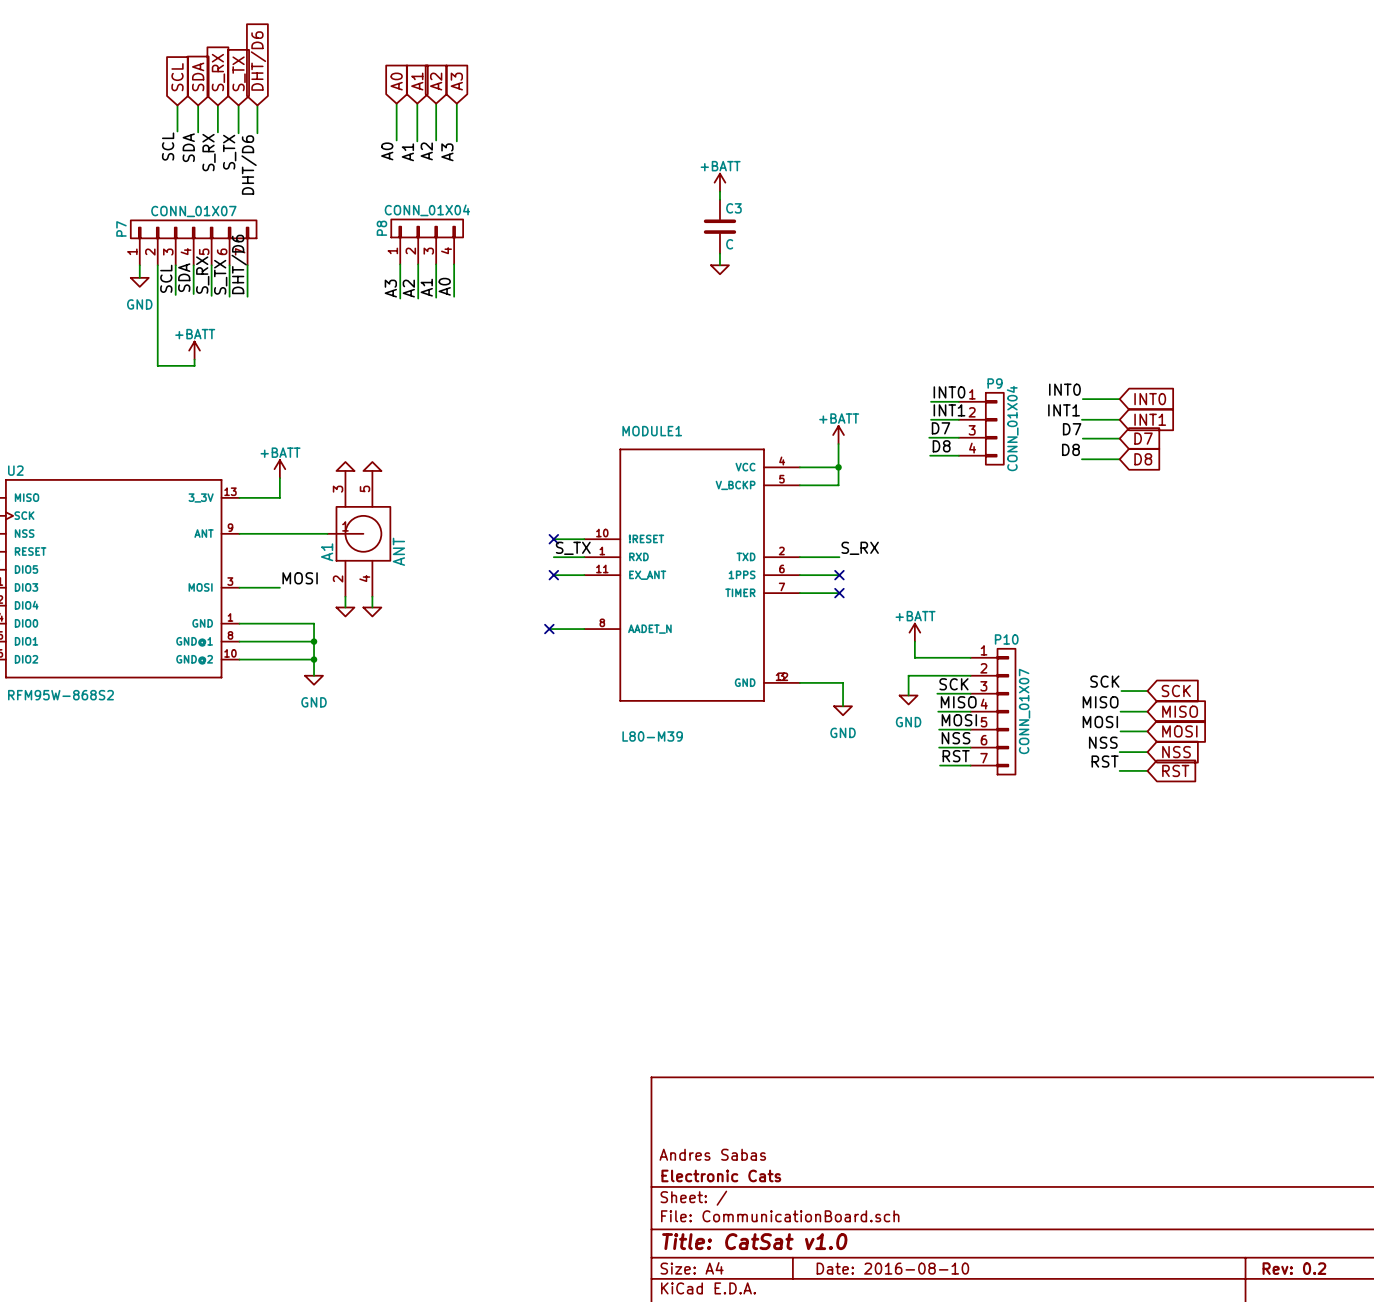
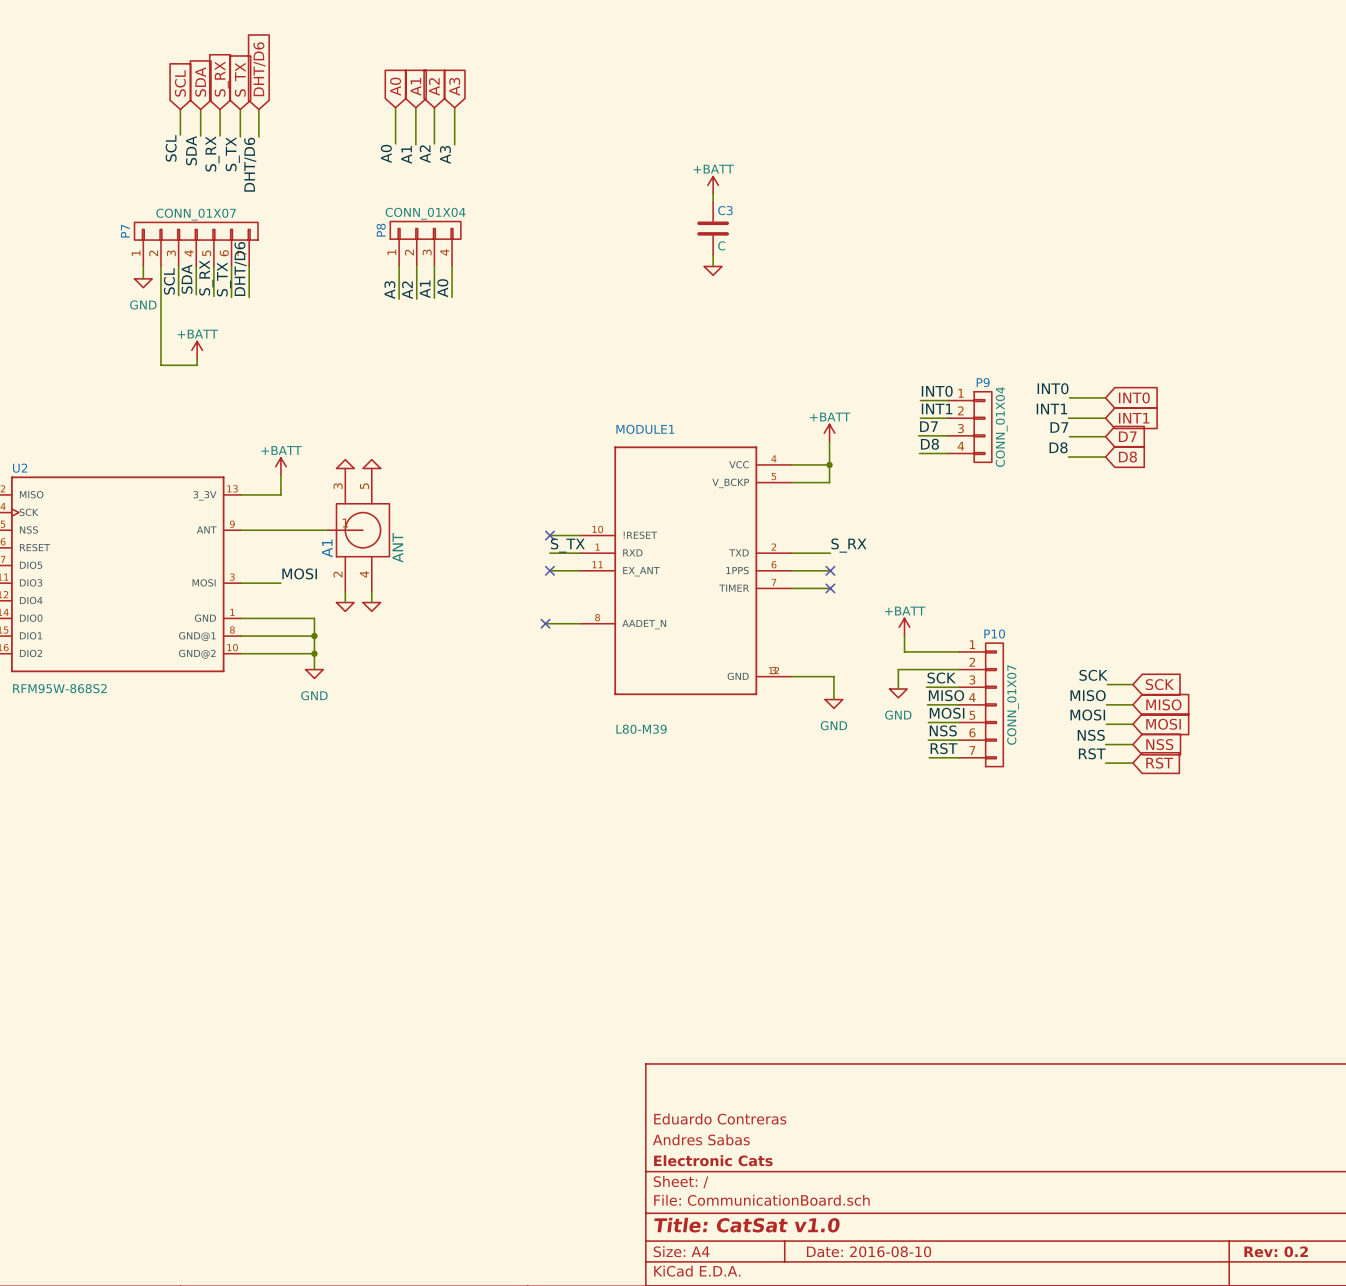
title block: none -> Eduardo Contreras (720, 1119)

